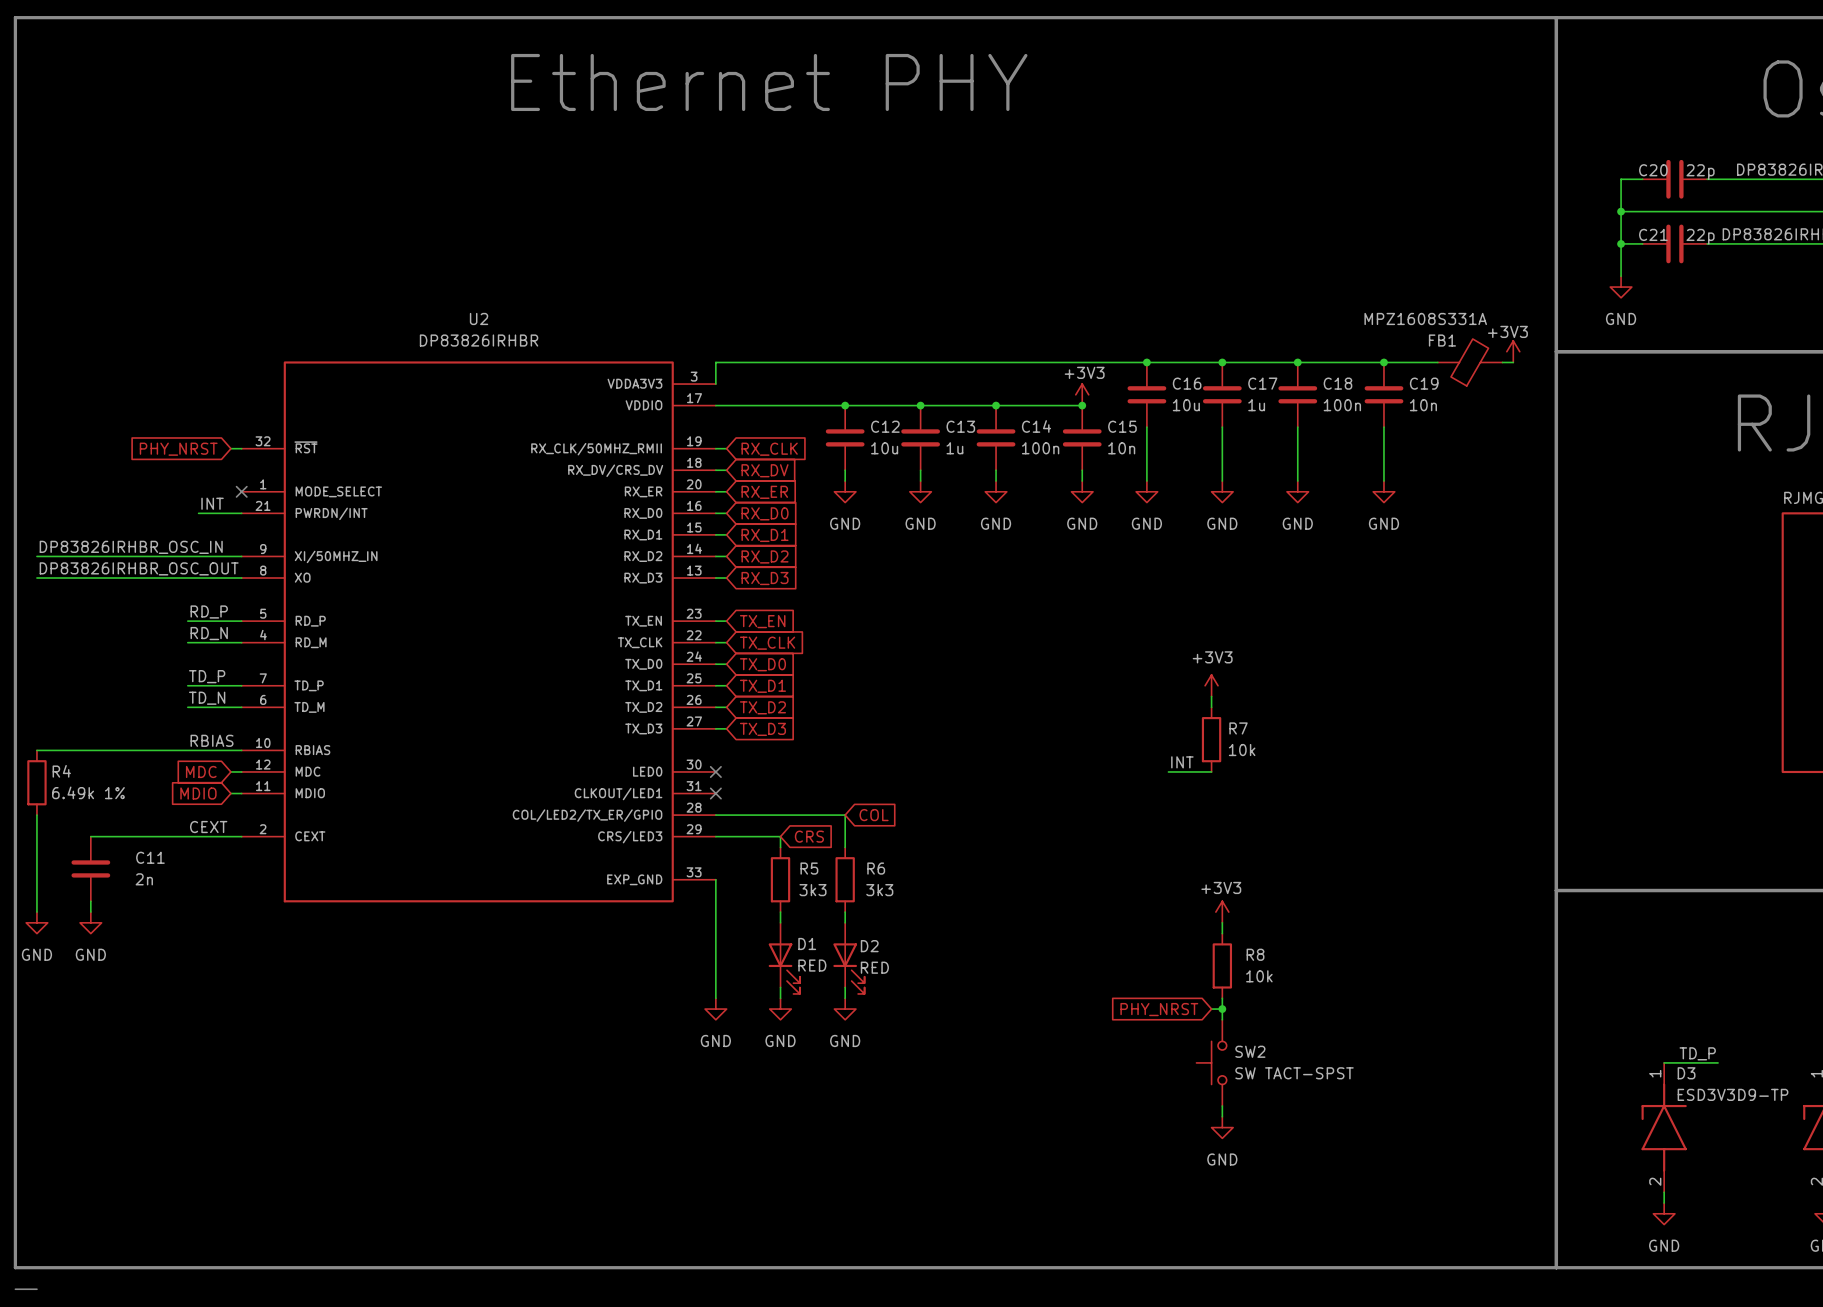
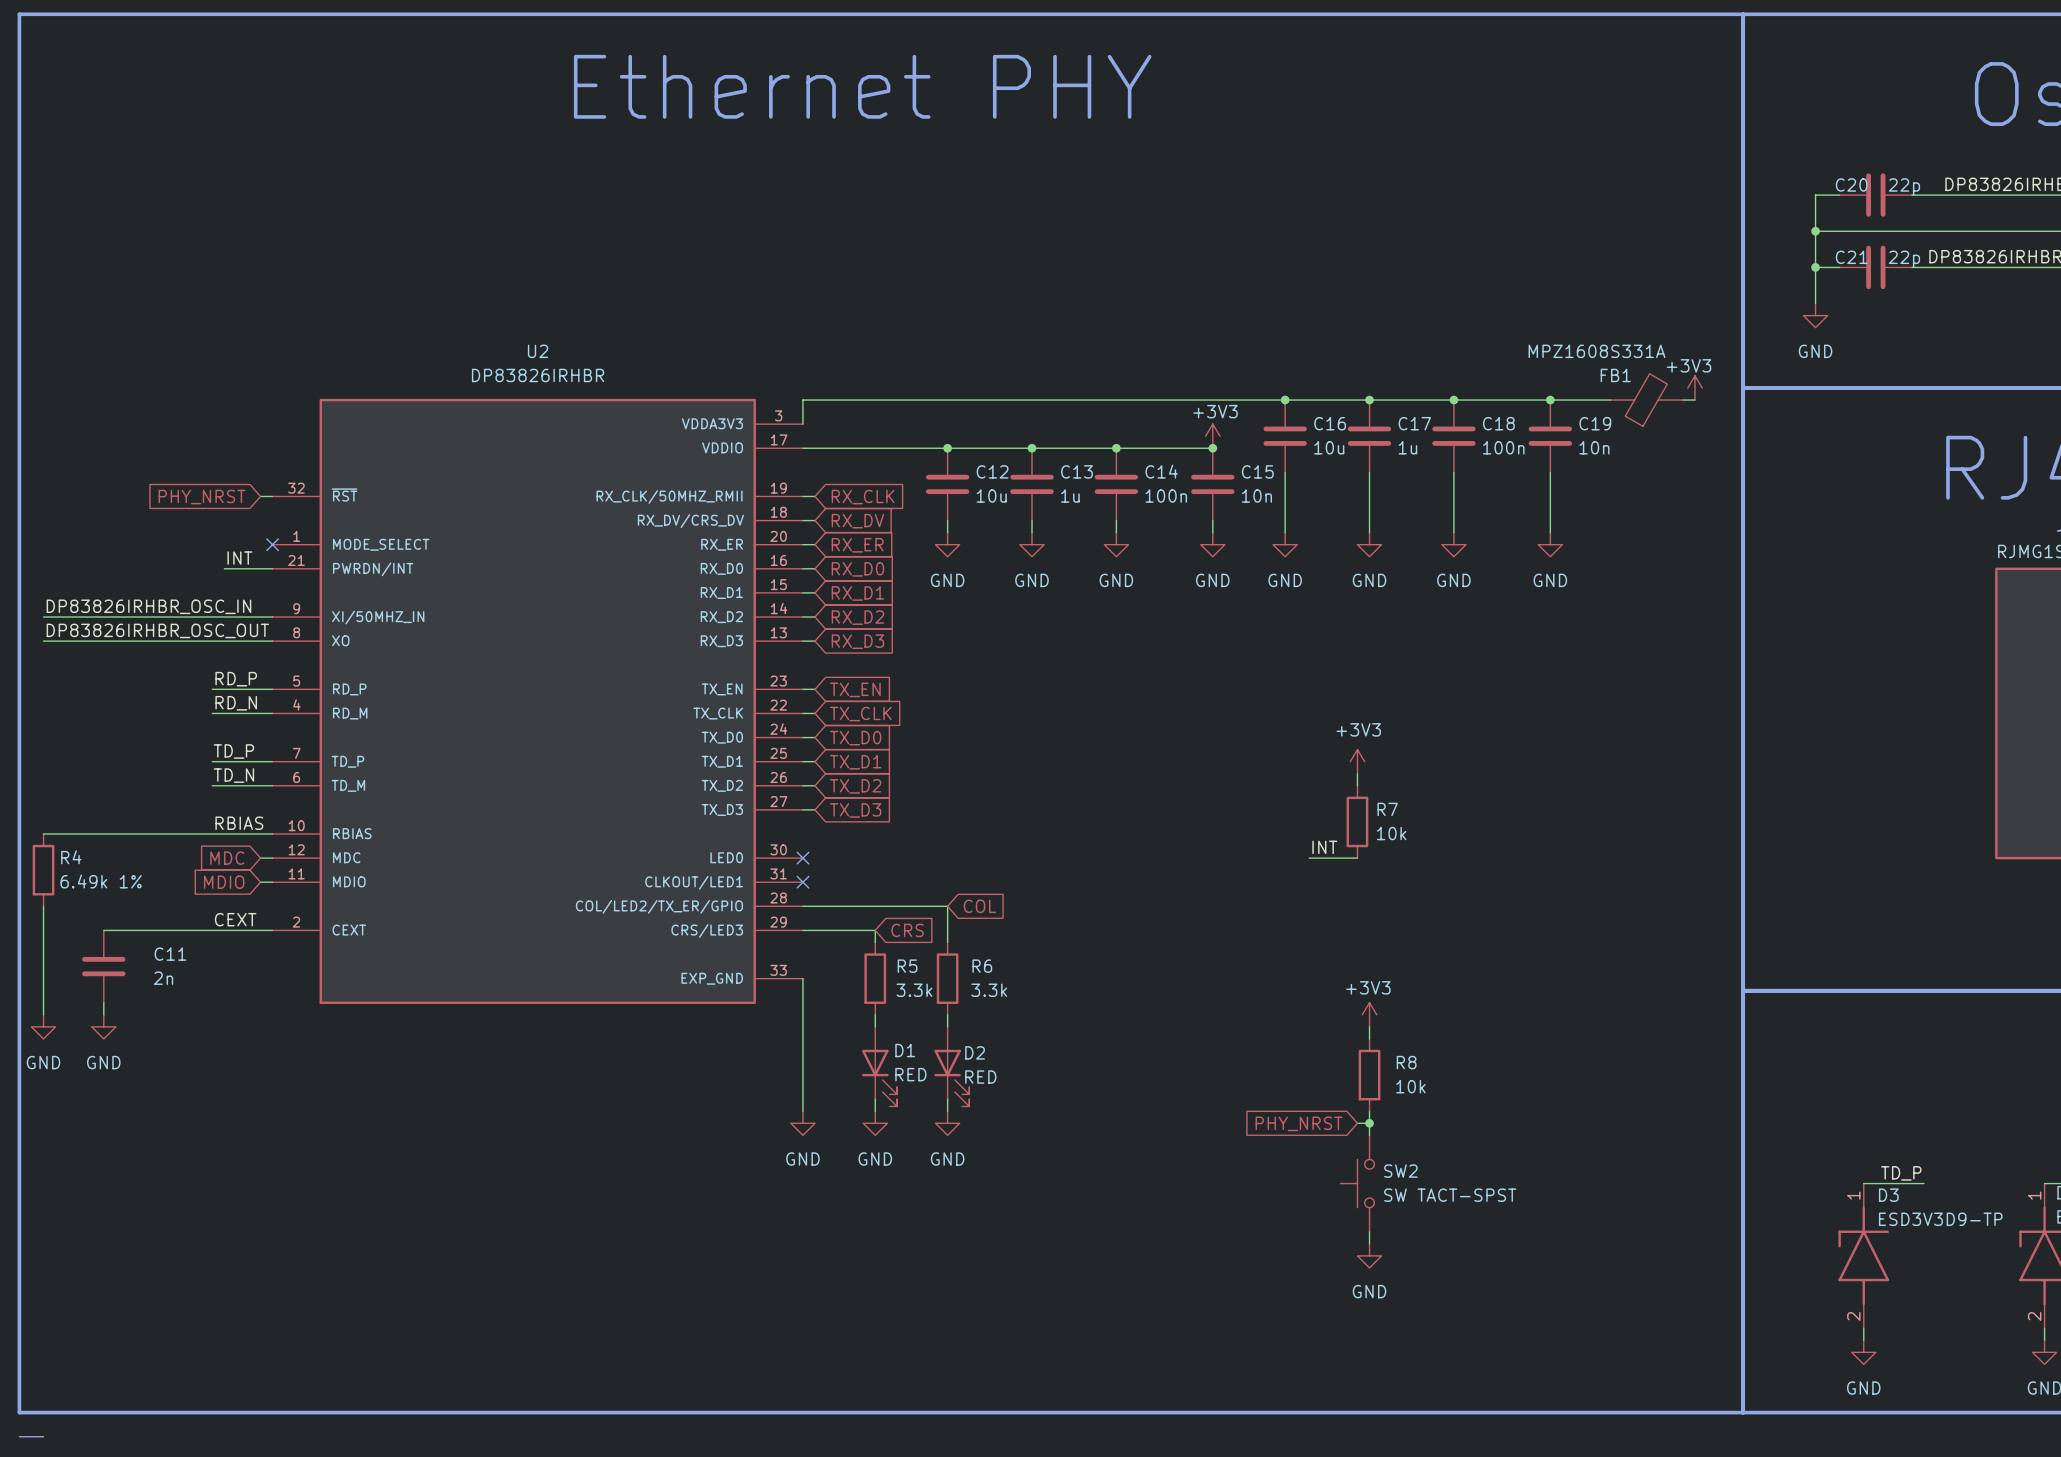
R5 value: 3k3 (812, 890) -> 3.3k (914, 990)
R6 value: 3k3 (879, 890) -> 3.3k (989, 990)

